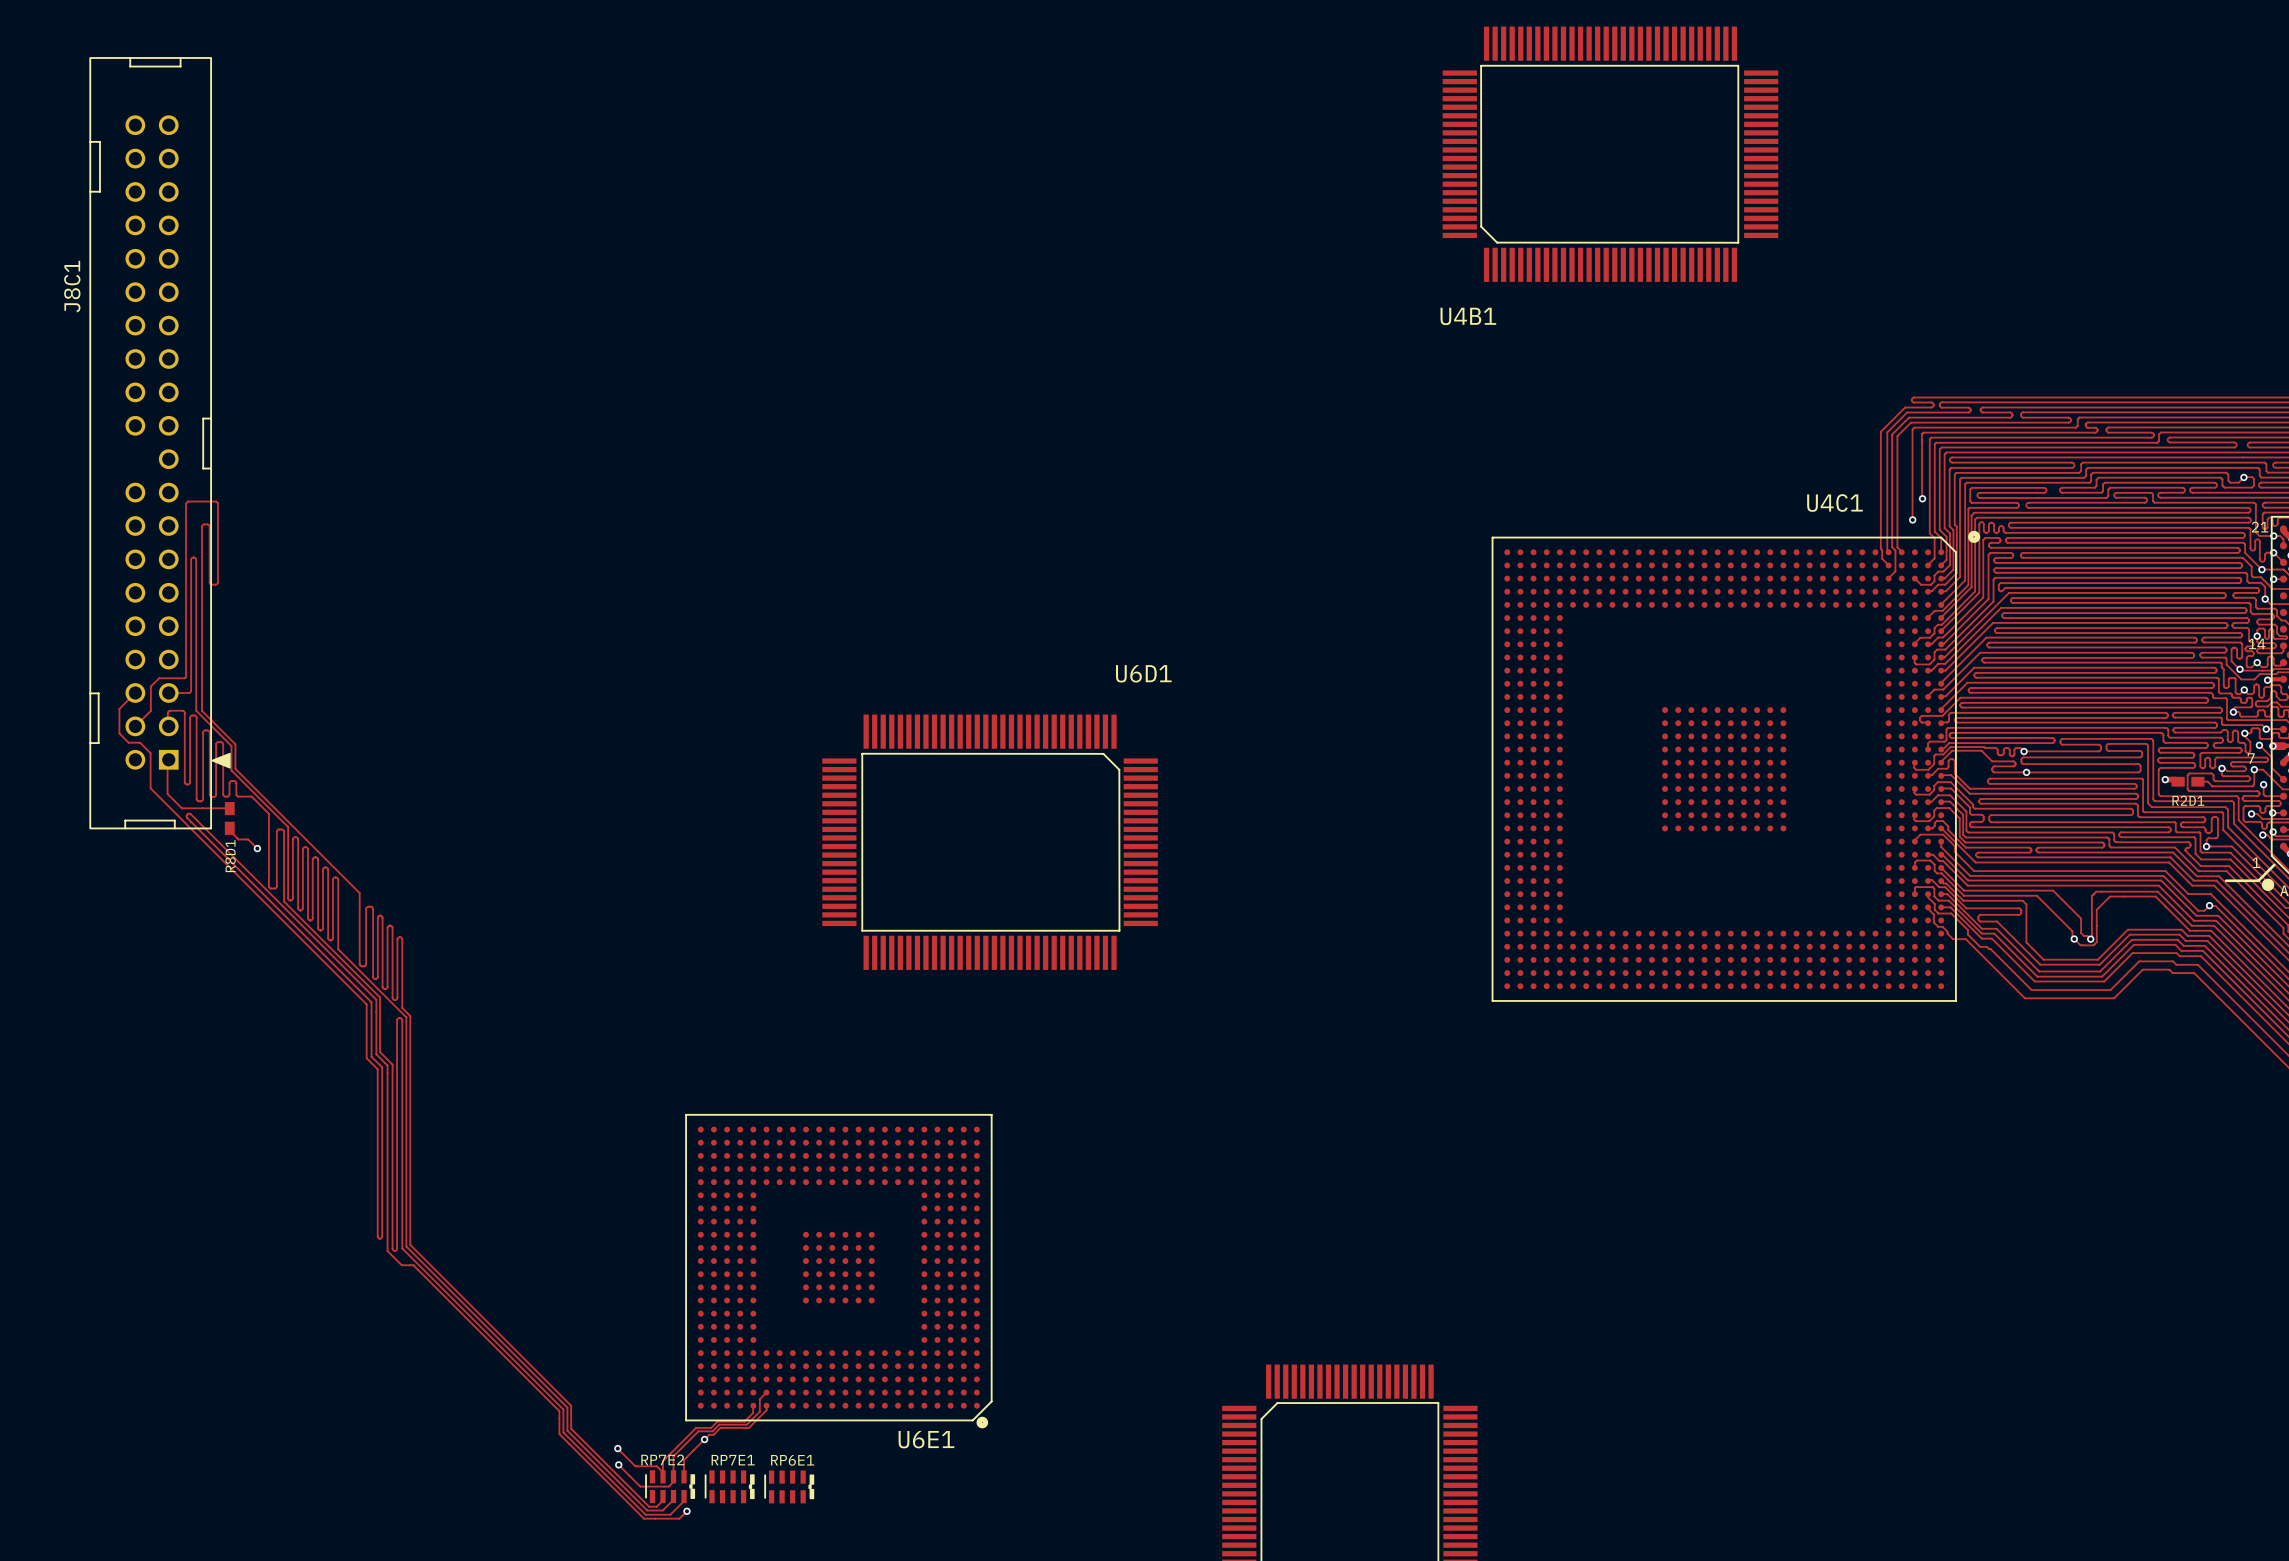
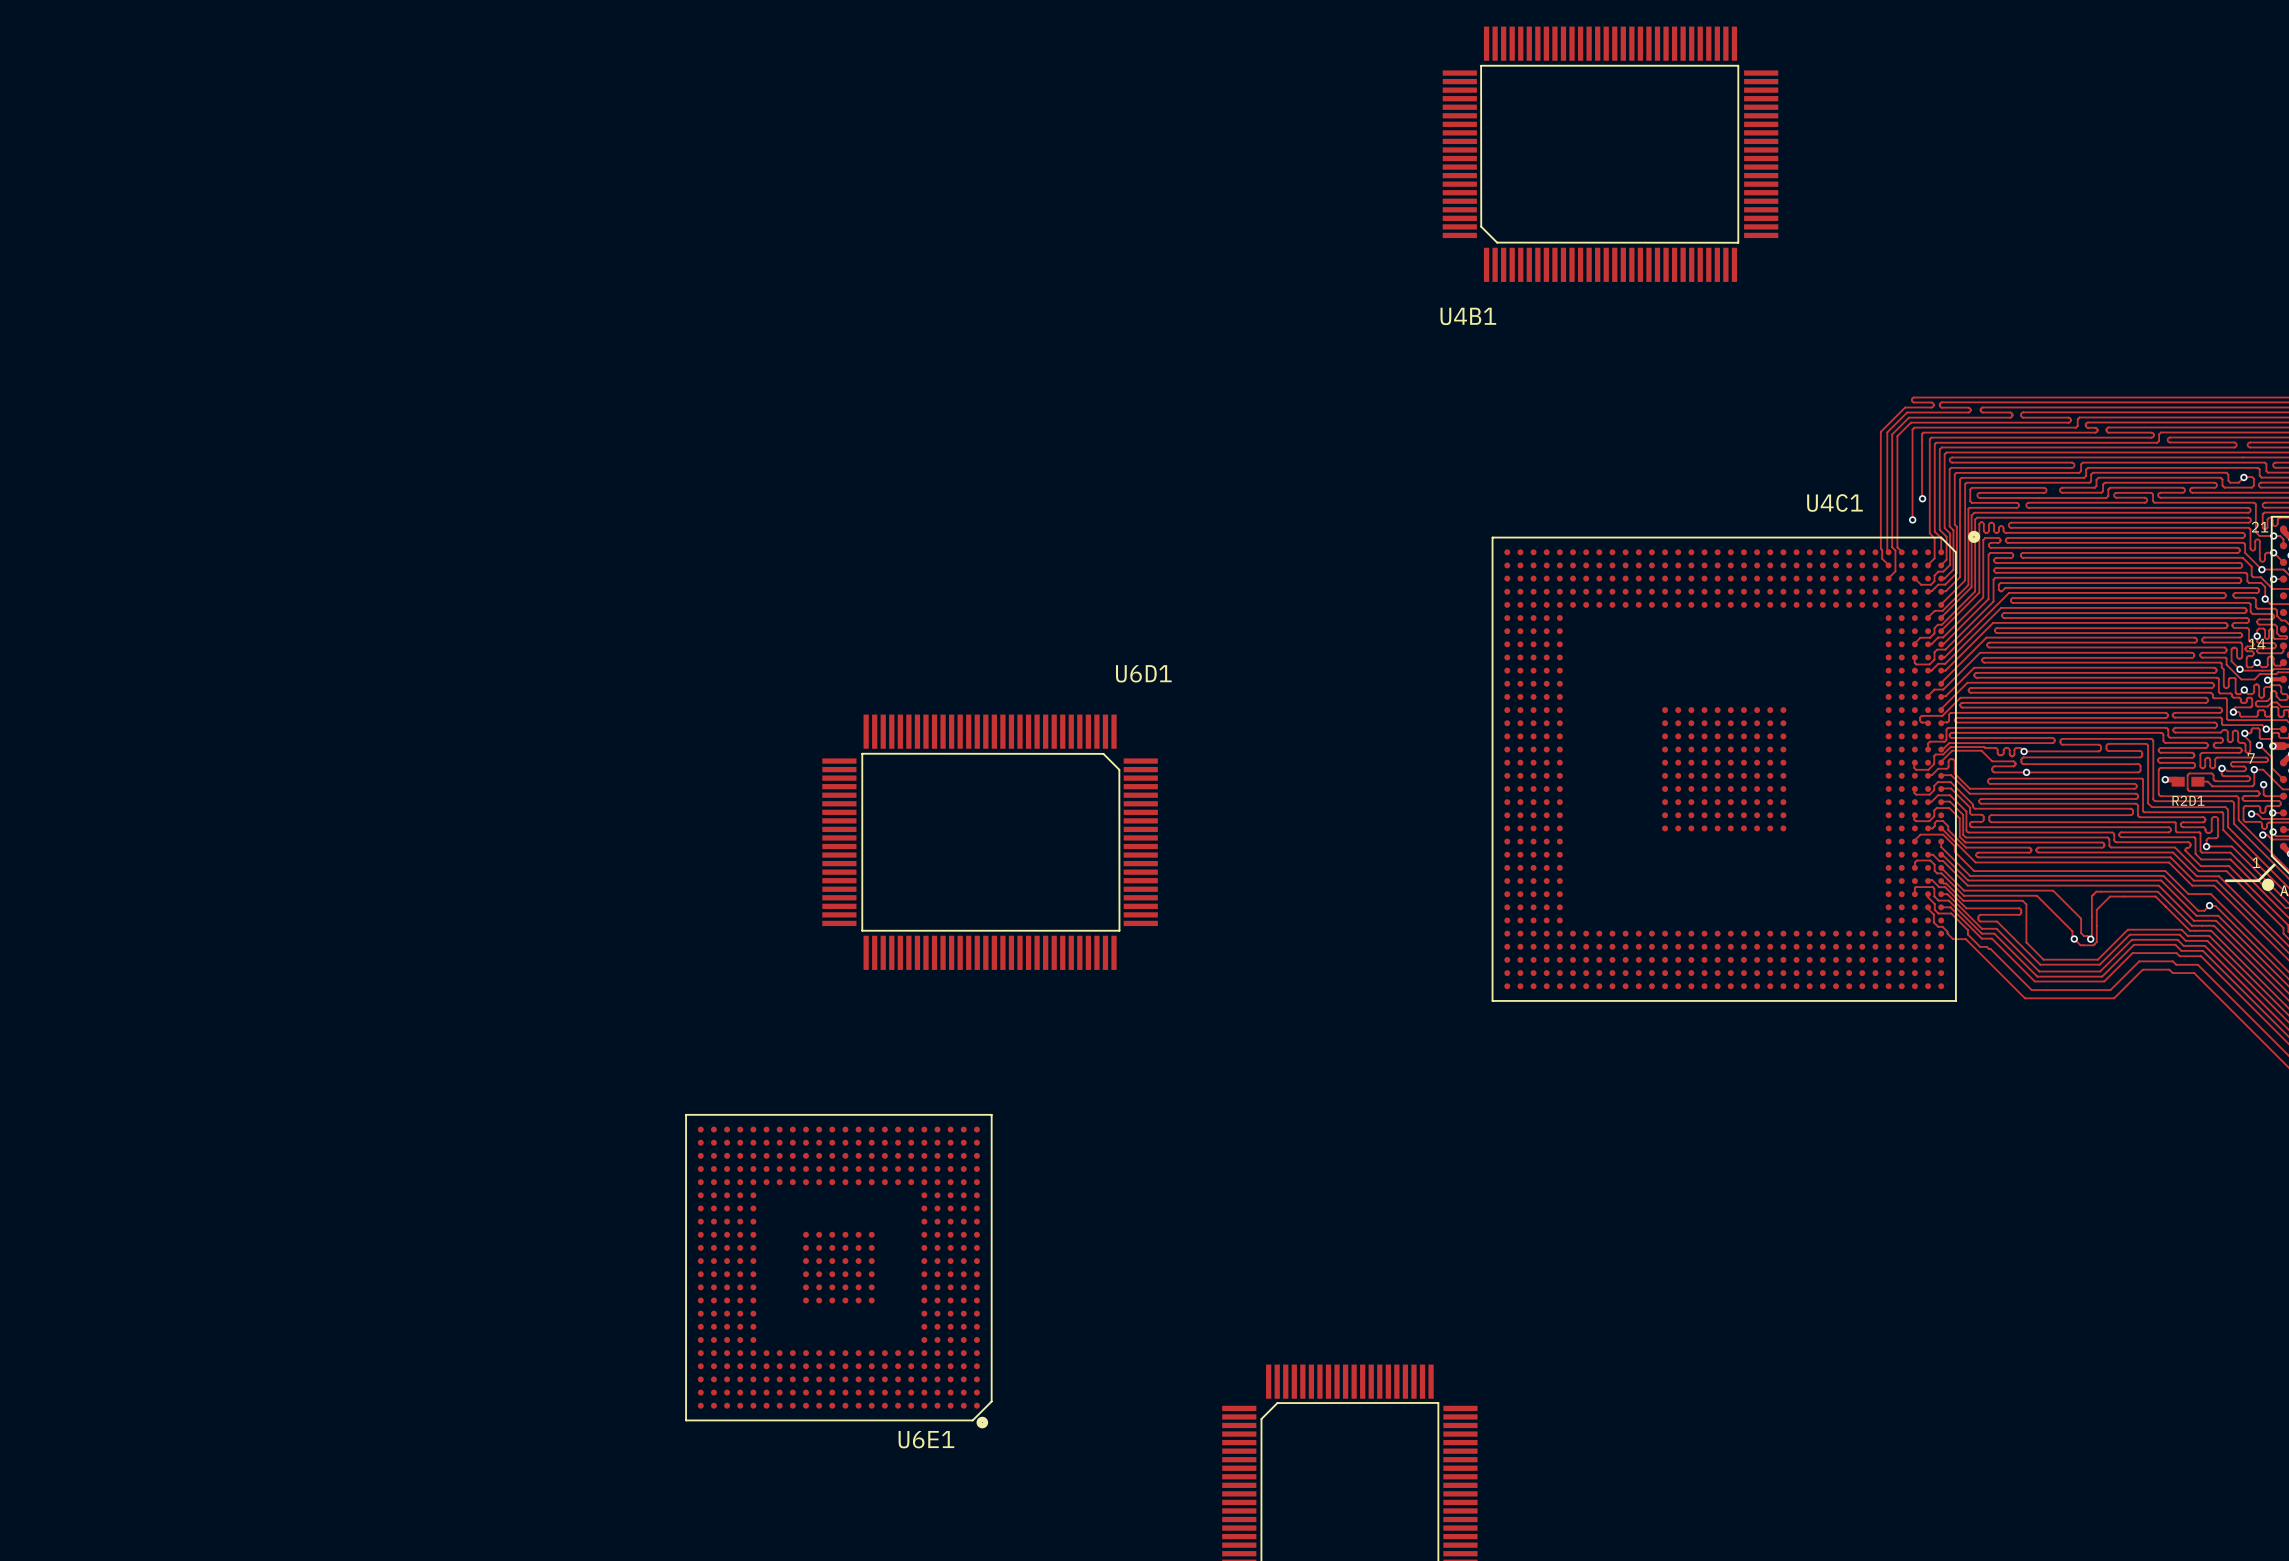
J8C1: (160, 443) -> none
track: (135, 692) (119, 708) (119, 733) (128, 742) (140, 742) (150, 753) (150, 788) (366, 1004) (366, 1058) (377, 1069) (378, 1237) (380, 1238) (382, 1236) (382, 1067) (371, 1056) (371, 1002) (187, 817) (188, 813) (376, 999) (376, 1054) (387, 1065) (387, 1251) (401, 1265) (413, 1265) (559, 1411) (559, 1434) (643, 1518) (679, 1518) (686, 1511) -> none
track: (168, 692) (189, 692) (191, 691) (191, 559) (194, 557) (196, 559) (196, 710) (231, 745) (231, 770) (288, 827) (288, 898) (290, 900) -> none
track: (135, 726) (150, 710) (150, 686) (159, 678) (185, 677) (185, 503) (188, 501) (216, 501) (217, 503) (217, 582) (216, 584) (209, 582) (209, 526) (203, 524) (202, 526) (202, 710) (235, 744) (235, 768) (359, 893) (359, 964) (361, 966) (366, 964) (366, 908) (368, 906) (372, 907) (373, 976) (375, 978) -> none
track: (168, 726) (168, 711) (184, 711) (184, 782) (188, 784) (190, 782) (190, 717) (192, 715) (196, 716) (196, 799) (198, 801) (203, 799) (203, 731) (207, 730) (209, 732) (209, 794) (211, 796) (216, 794) (216, 743) (222, 743) (223, 795) (229, 795) (229, 782) (234, 781) (237, 796) (251, 796) (268, 813) (269, 887) (274, 888) (276, 886) (276, 831) (282, 829) (284, 831) (284, 901) (380, 997) (380, 1052) (392, 1064) (392, 1249) (395, 1250) (397, 1248) (397, 1020) (400, 1018) (402, 1020) (402, 1248) (563, 1409) (563, 1432) (645, 1514) (670, 1514) (684, 1501) (684, 1496) -> none
track: (168, 759) (167, 793) (181, 808) (229, 808) -> none
R8D1: (229, 818) -> none
track: (229, 828) (229, 830) (238, 839) (248, 839) (257, 848) -> none
via: (257, 848) -> none
track: (290, 900) (292, 898) (292, 839) (296, 837) (298, 839) (298, 908) (300, 910) -> none
track: (300, 910) (302, 908) (302, 849) (306, 847) (308, 849) (308, 918) (310, 920) -> none
track: (380, 915) (377, 917) (377, 977) (375, 978) -> none
track: (380, 915) (382, 917) (382, 987) (385, 989) (387, 987) (387, 927) (390, 925) (392, 927) (392, 998) (395, 1000) (397, 998) (397, 939) (400, 937) (402, 939) (402, 1008) (410, 1016) (410, 1244) (571, 1405) (571, 1428) (649, 1506) (656, 1506) (662, 1500) (662, 1496) -> none
track: (310, 920) (312, 918) (312, 859) (316, 857) (318, 859) (318, 929) (321, 930) (322, 928) (323, 869) (326, 867) (328, 869) (328, 939) (331, 940) (332, 938) (332, 879) (336, 877) (338, 879) (338, 949) (406, 1017) (406, 1246) (567, 1407) (567, 1430) (647, 1510) (662, 1510) (673, 1499) (673, 1496) -> none
track: (766, 1392) (759, 1399) (759, 1411) (746, 1424) (719, 1424) (712, 1431) (698, 1431) (673, 1456) (673, 1481) (668, 1486) (640, 1486) (618, 1465) -> none
track: (753, 1405) (753, 1412) (744, 1421) (717, 1421) (711, 1427) (696, 1427) (662, 1461) (662, 1476) -> none
track: (766, 1405) (766, 1410) (748, 1427) (720, 1427) (713, 1434) (709, 1434) (704, 1439) -> none
track: (704, 1439) (684, 1459) (684, 1476) -> none
via: (704, 1439) -> none
track: (617, 1448) (635, 1466) (656, 1466) (662, 1472) -> none
via: (617, 1448) -> none
via: (618, 1464) -> none
RP7E2: (670, 1486) -> none
RP7E1: (729, 1486) -> none
RP6E1: (789, 1486) -> none
via: (686, 1511) -> none

